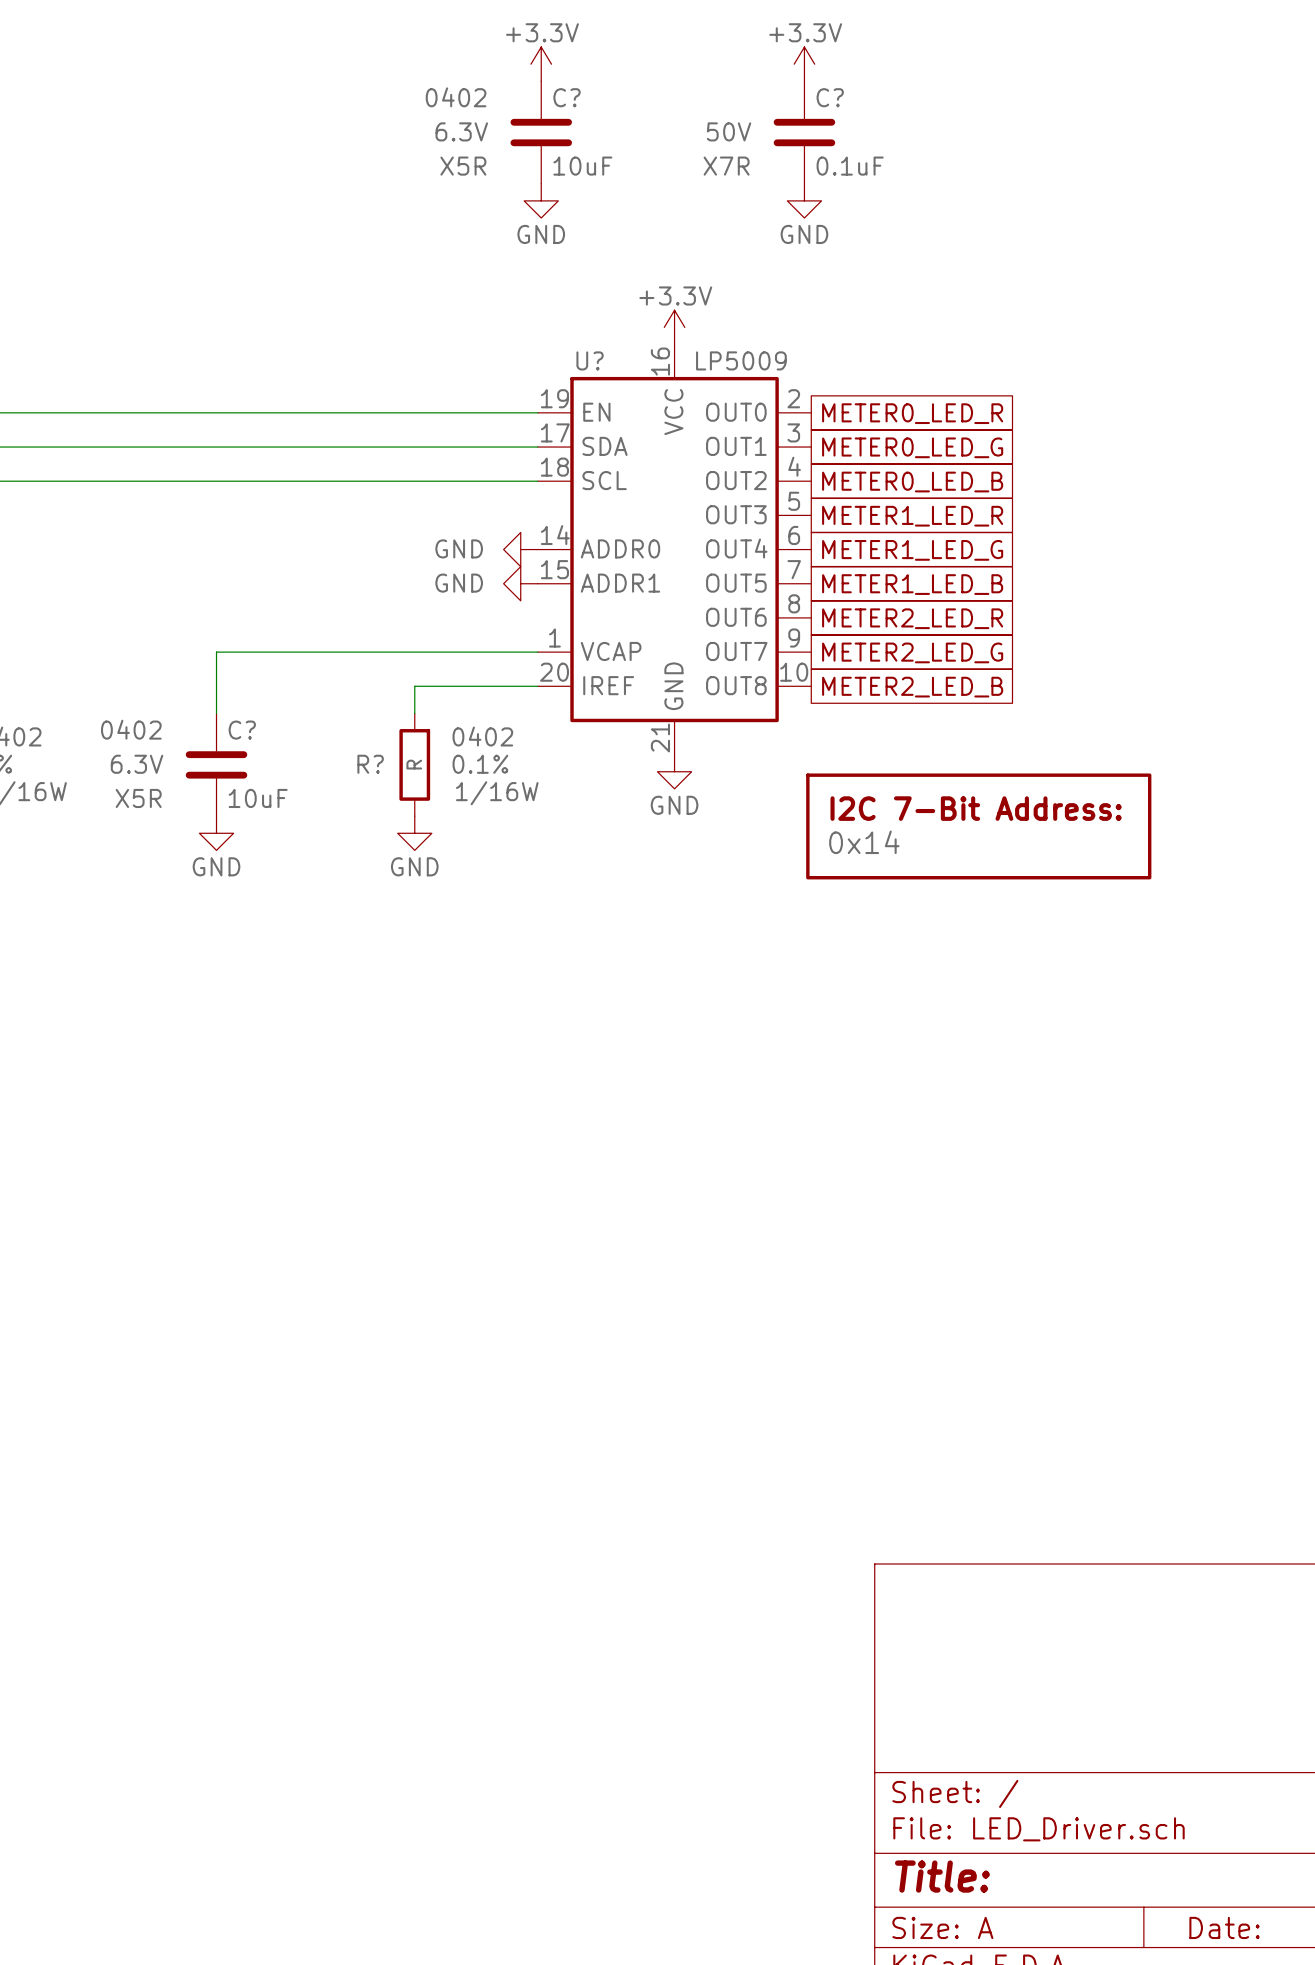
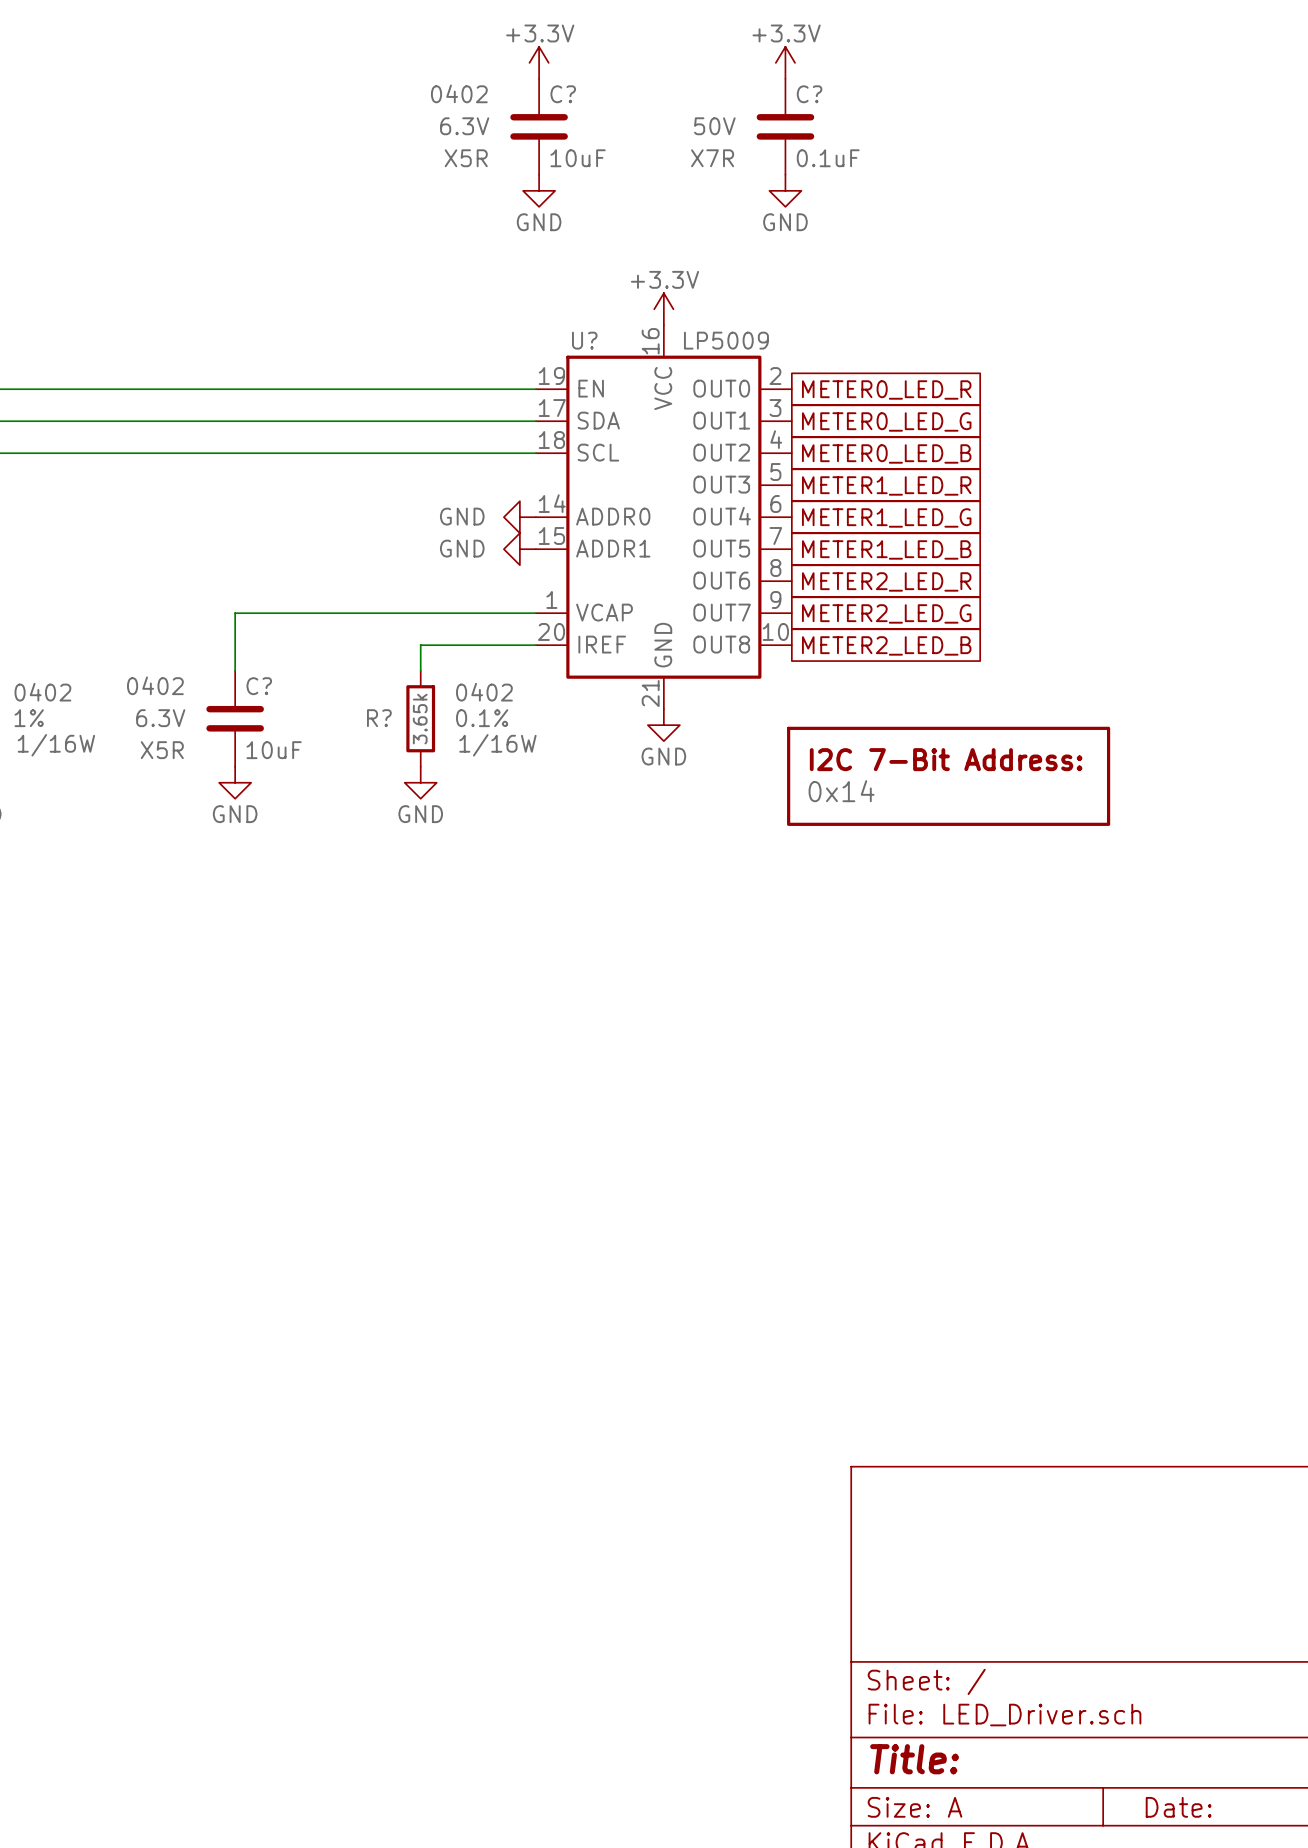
R? value: R (414, 764) -> 3.65k (420, 719)

